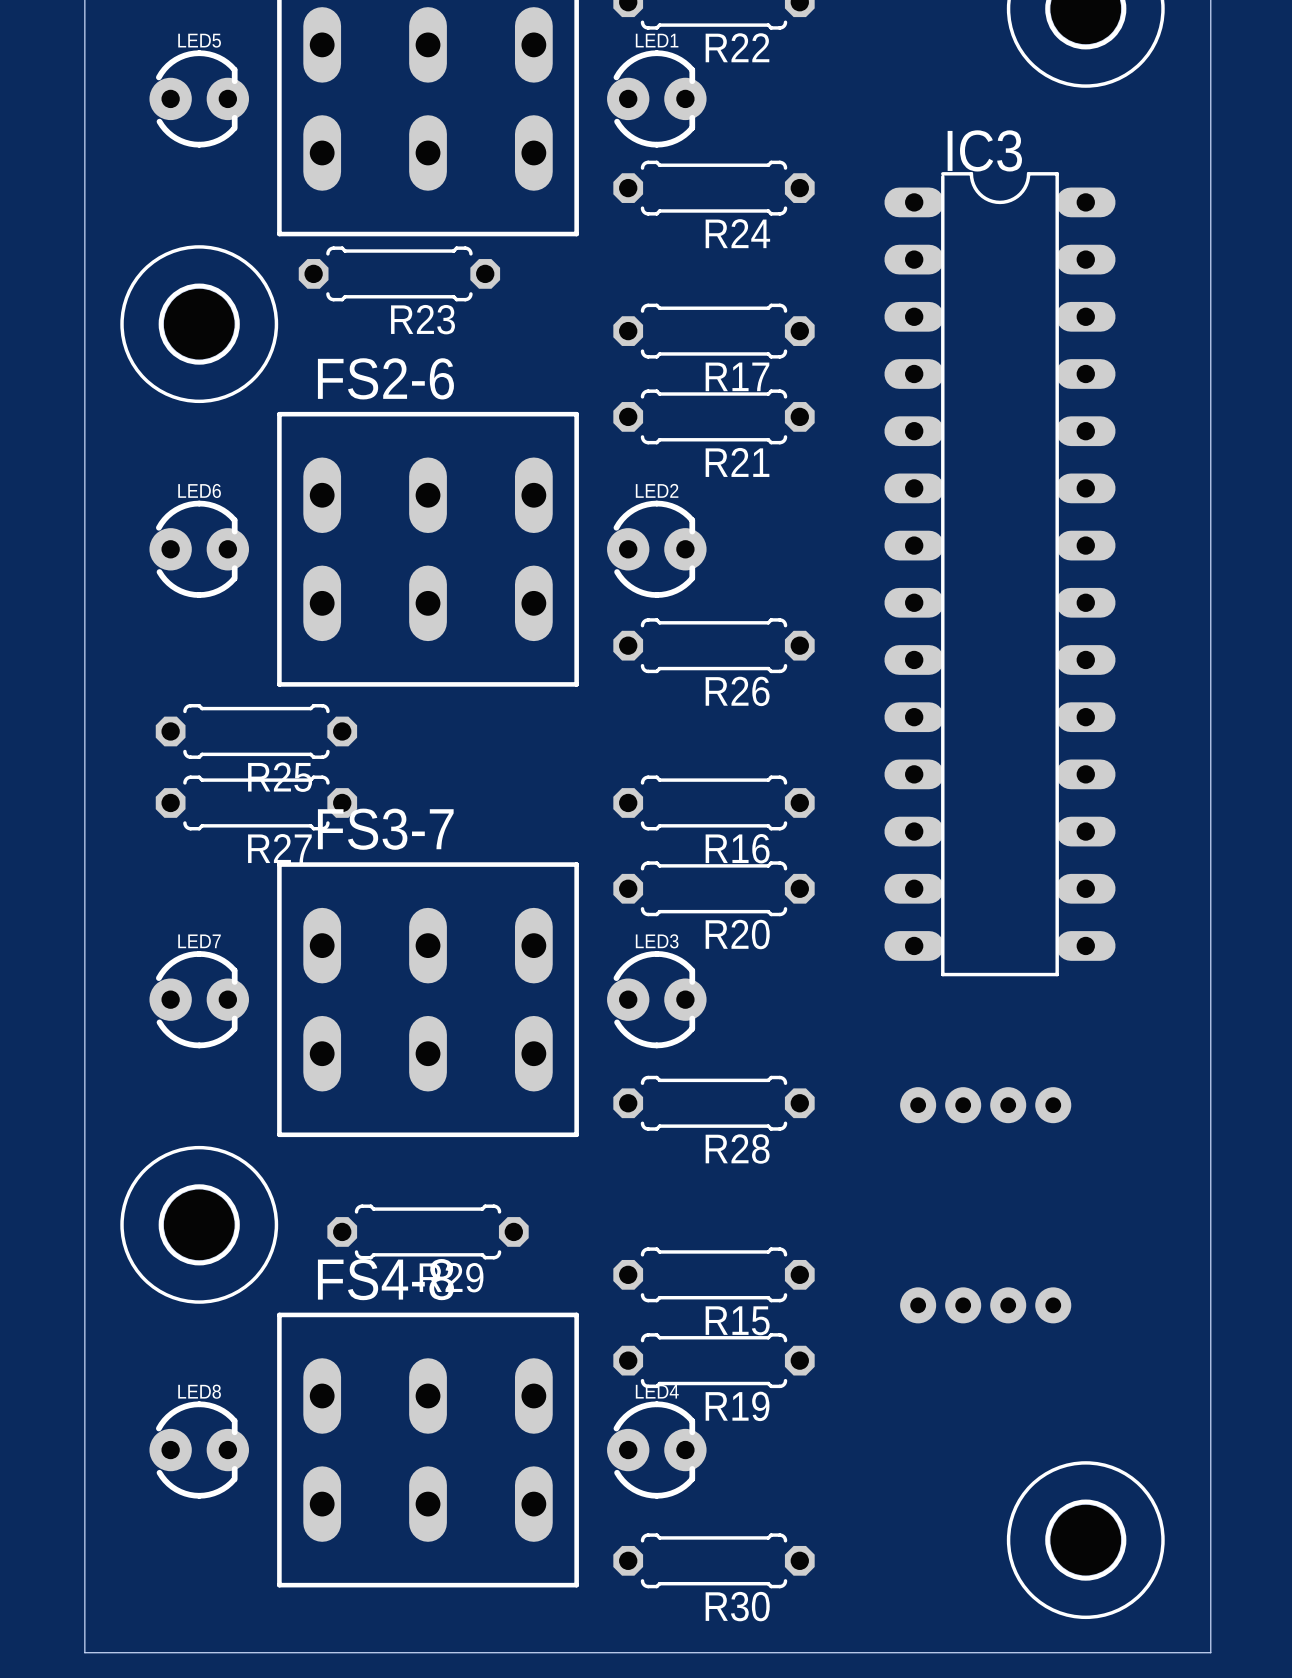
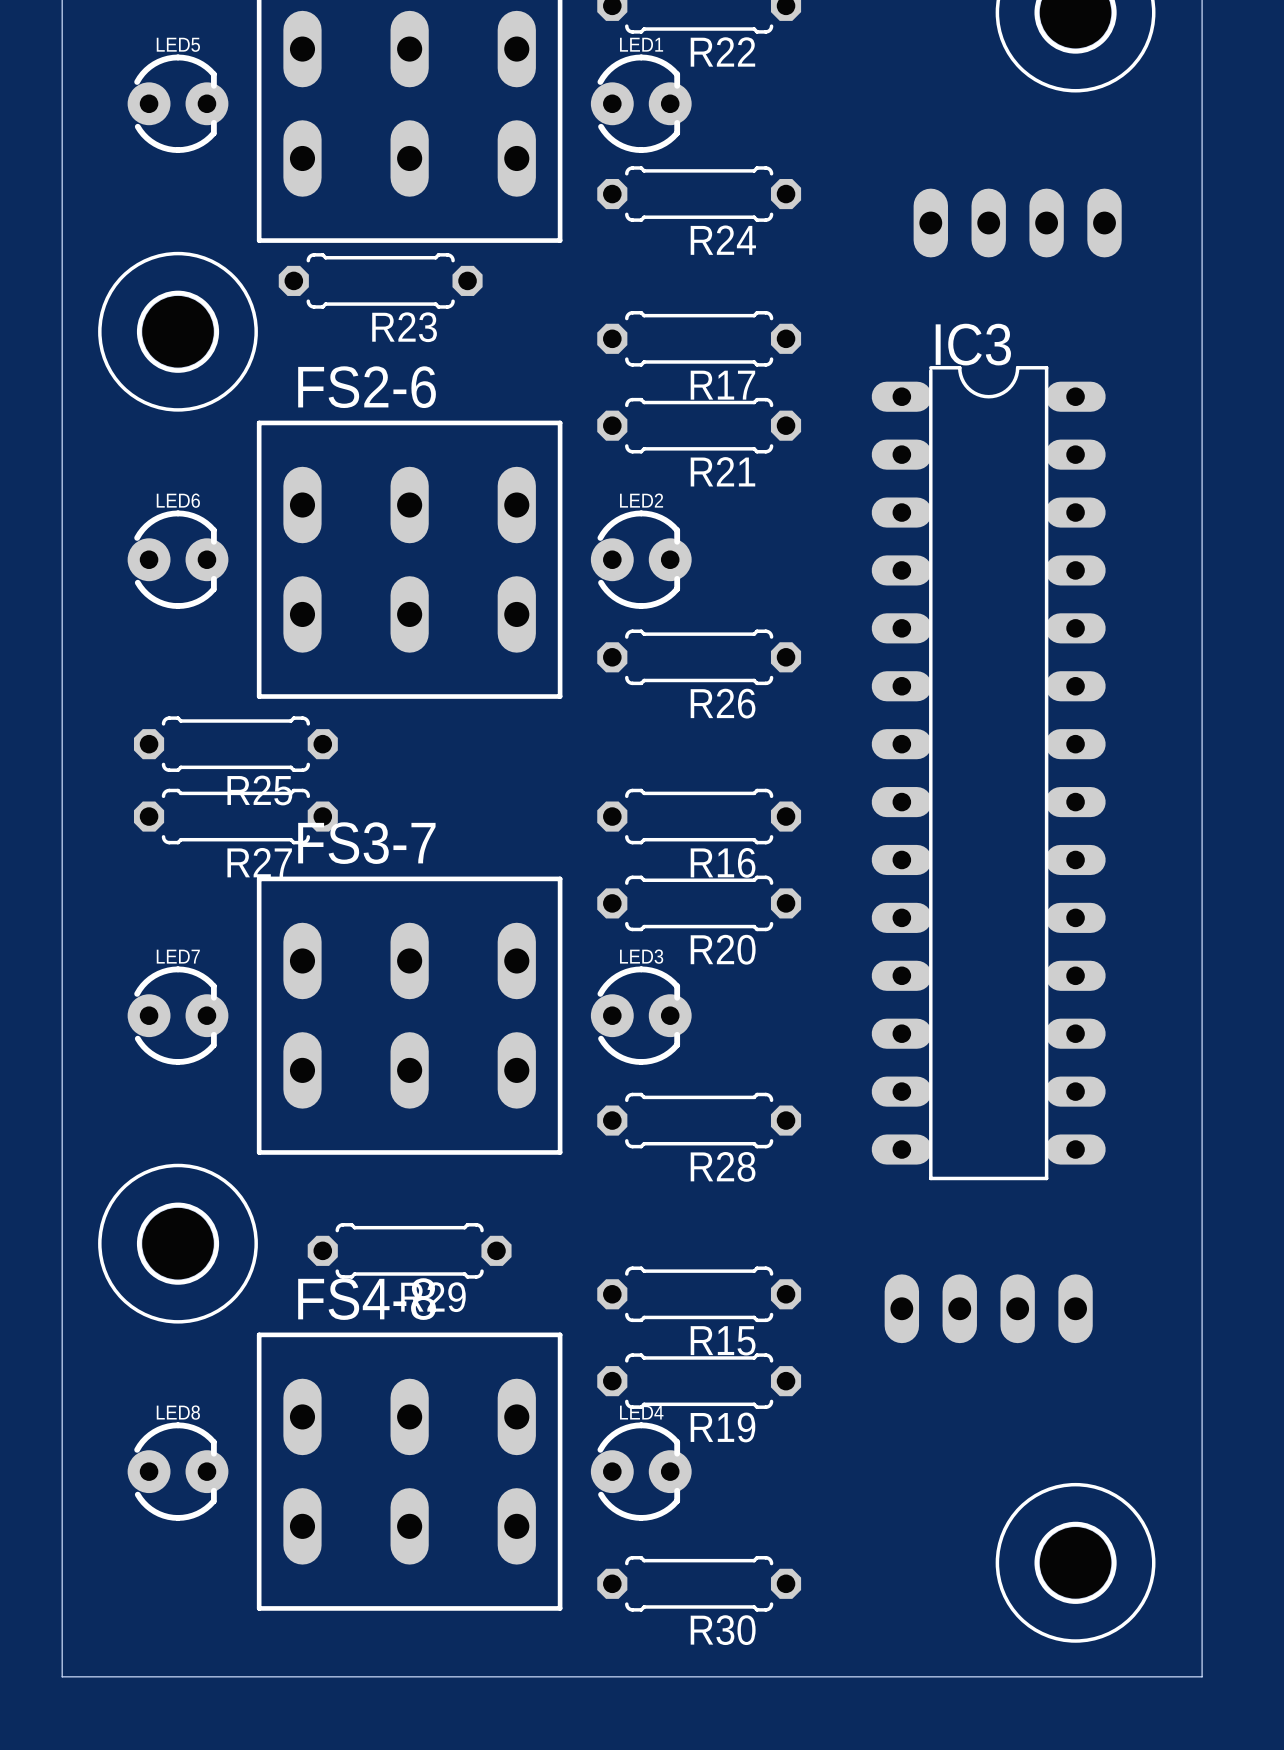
part: none -> (1017, 223)
IC3 position: (999, 574) -> (988, 773)
part: (985, 1105) -> none
part footprint: [900, 1287, 1072, 1324] -> [884, 1274, 1093, 1344]

